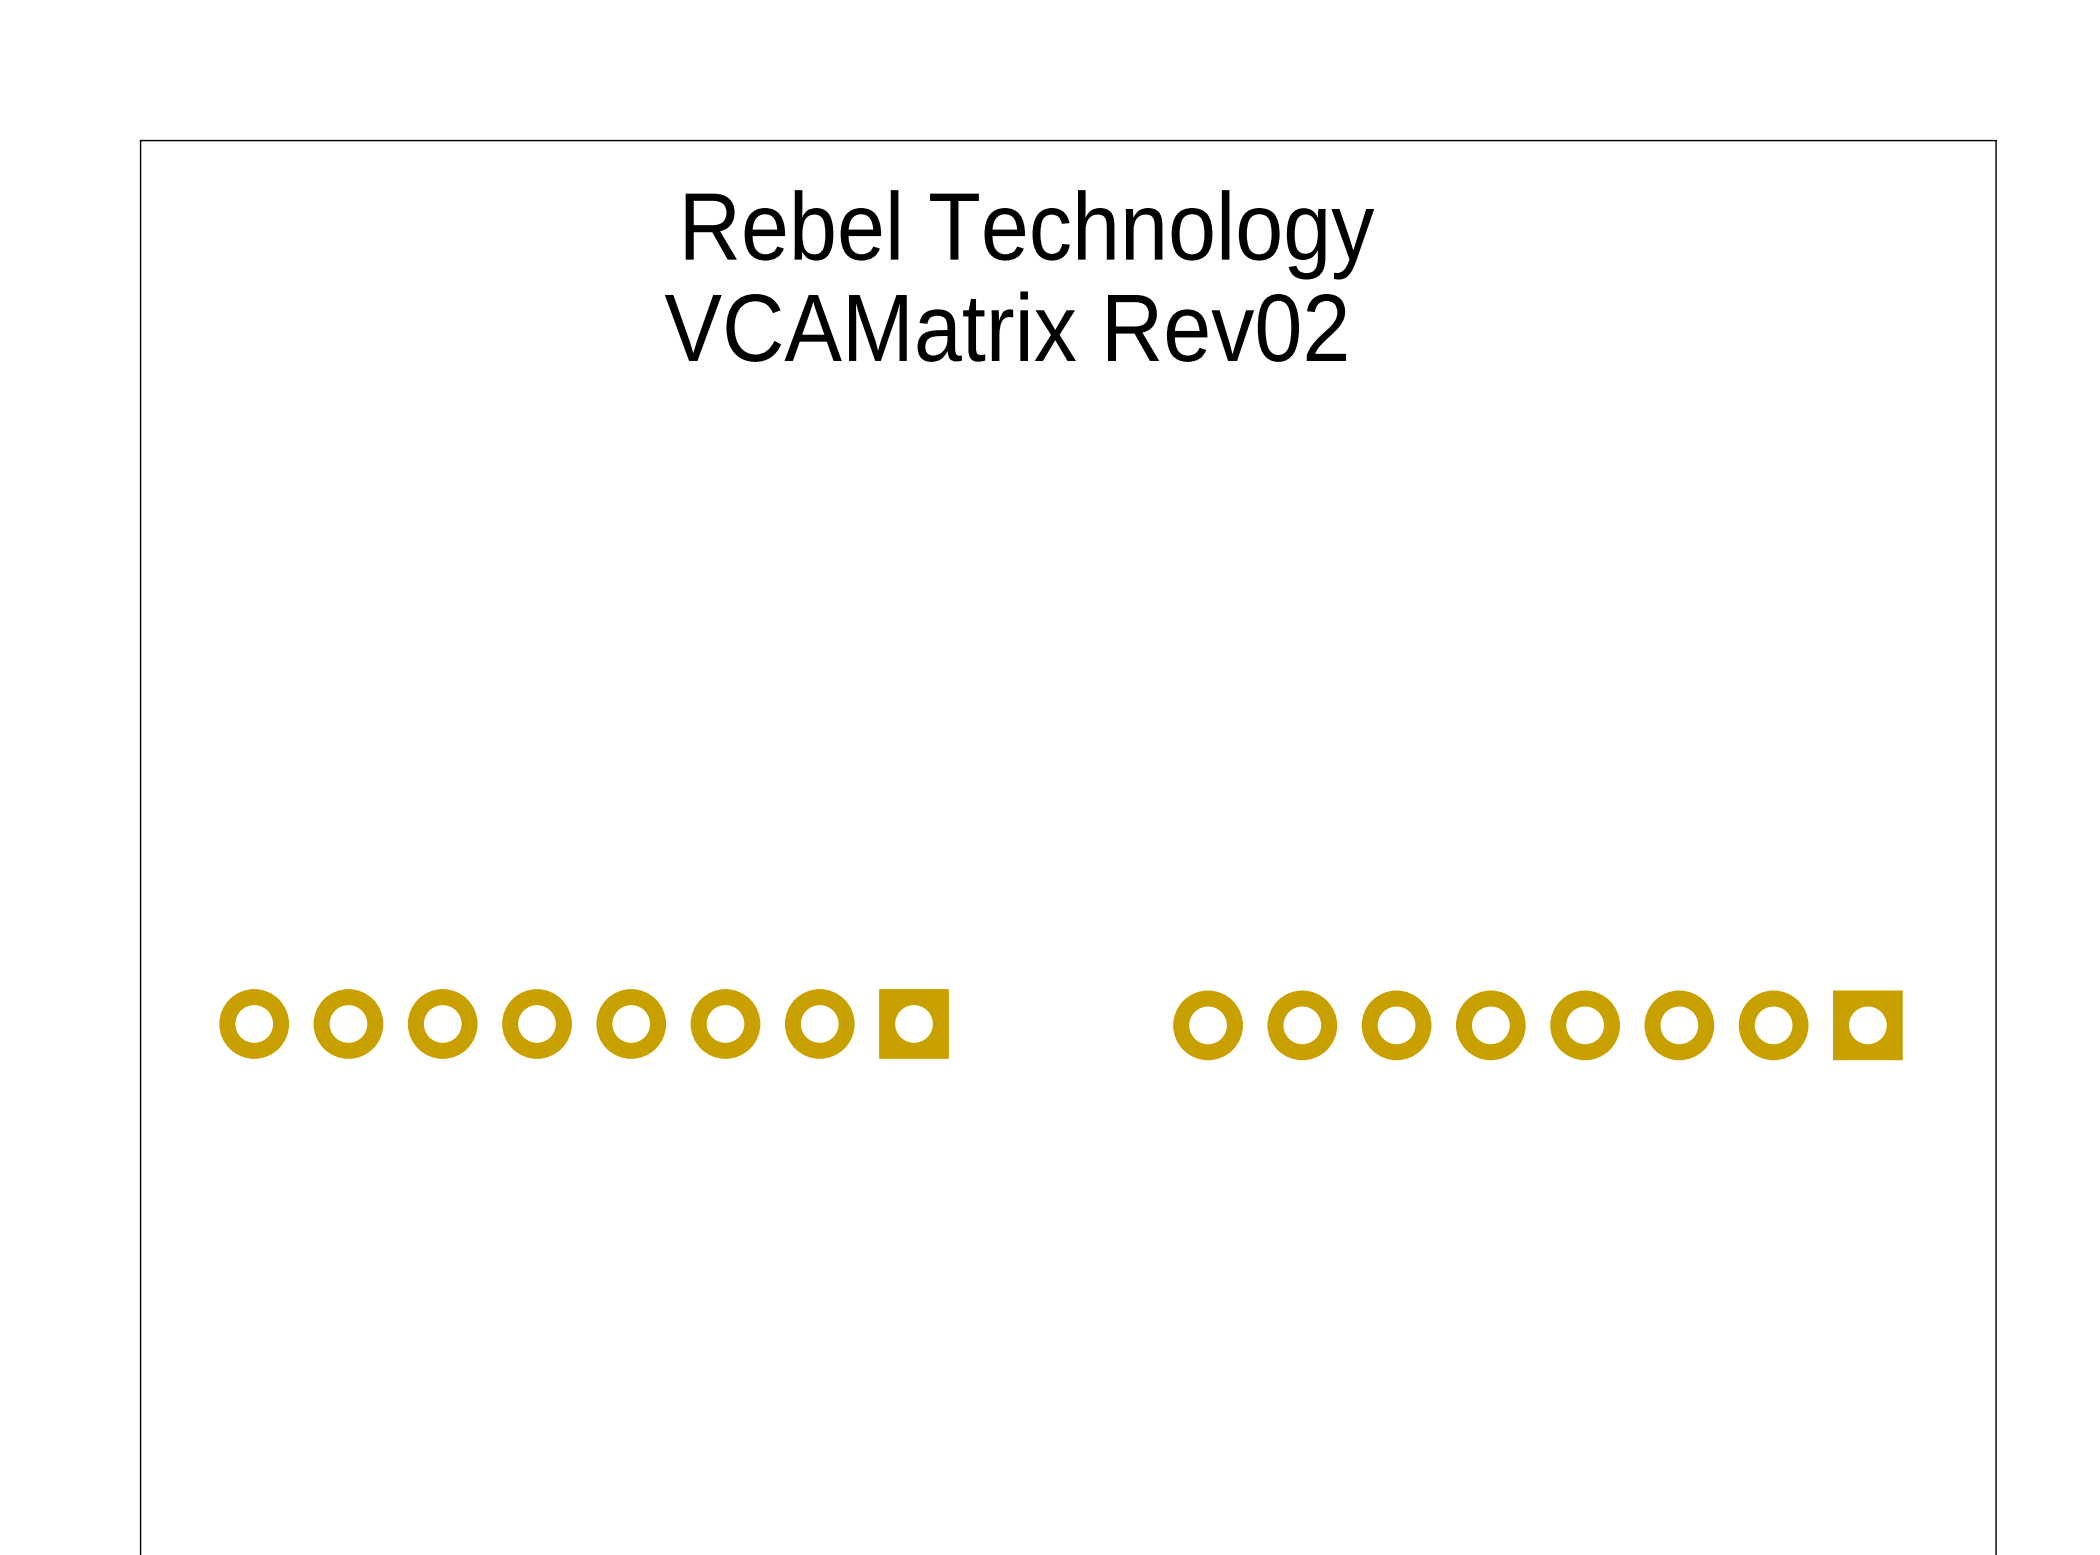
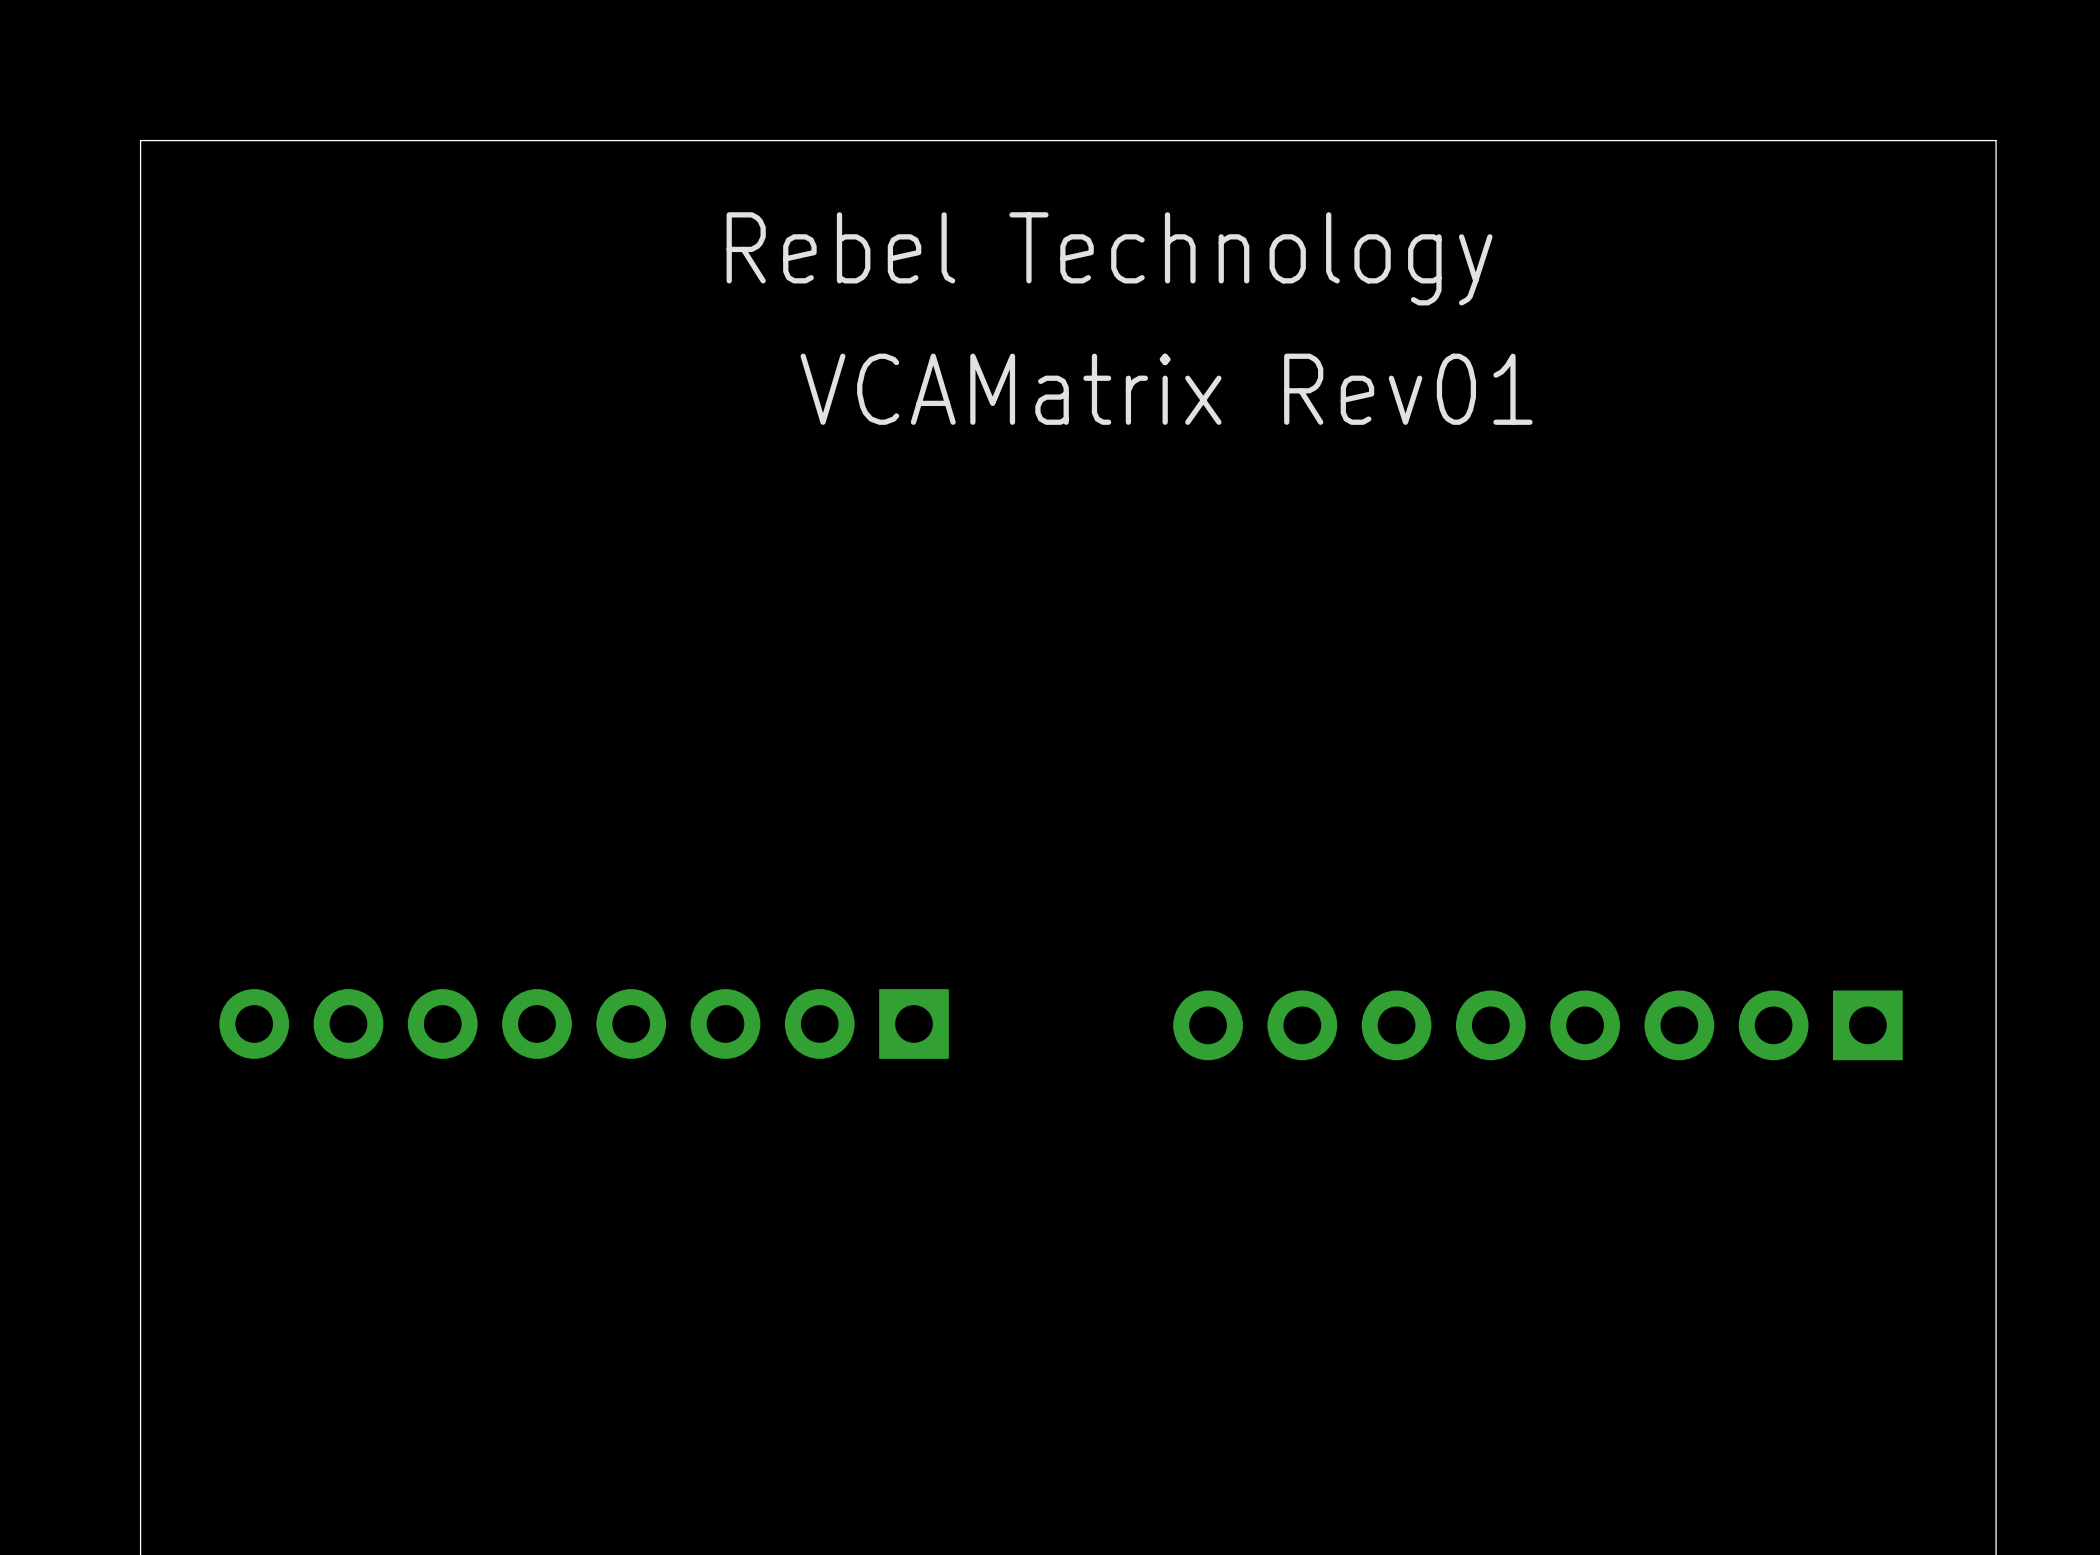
text position: Rebel Technology (1029, 234) -> Rebel Technology (1109, 258)
text: VCAMatrix Rev02 (1005, 326) -> VCAMatrix Rev01 (1166, 389)

